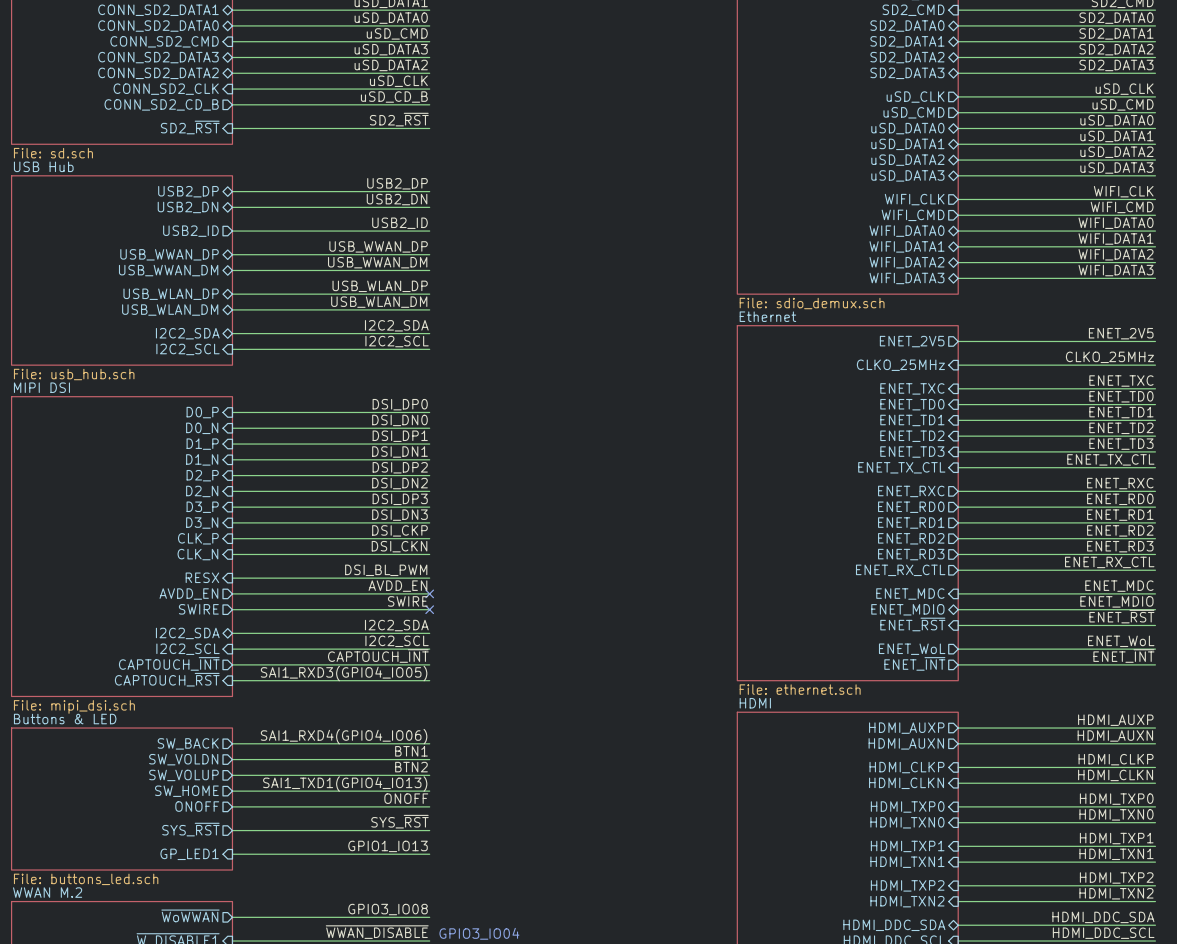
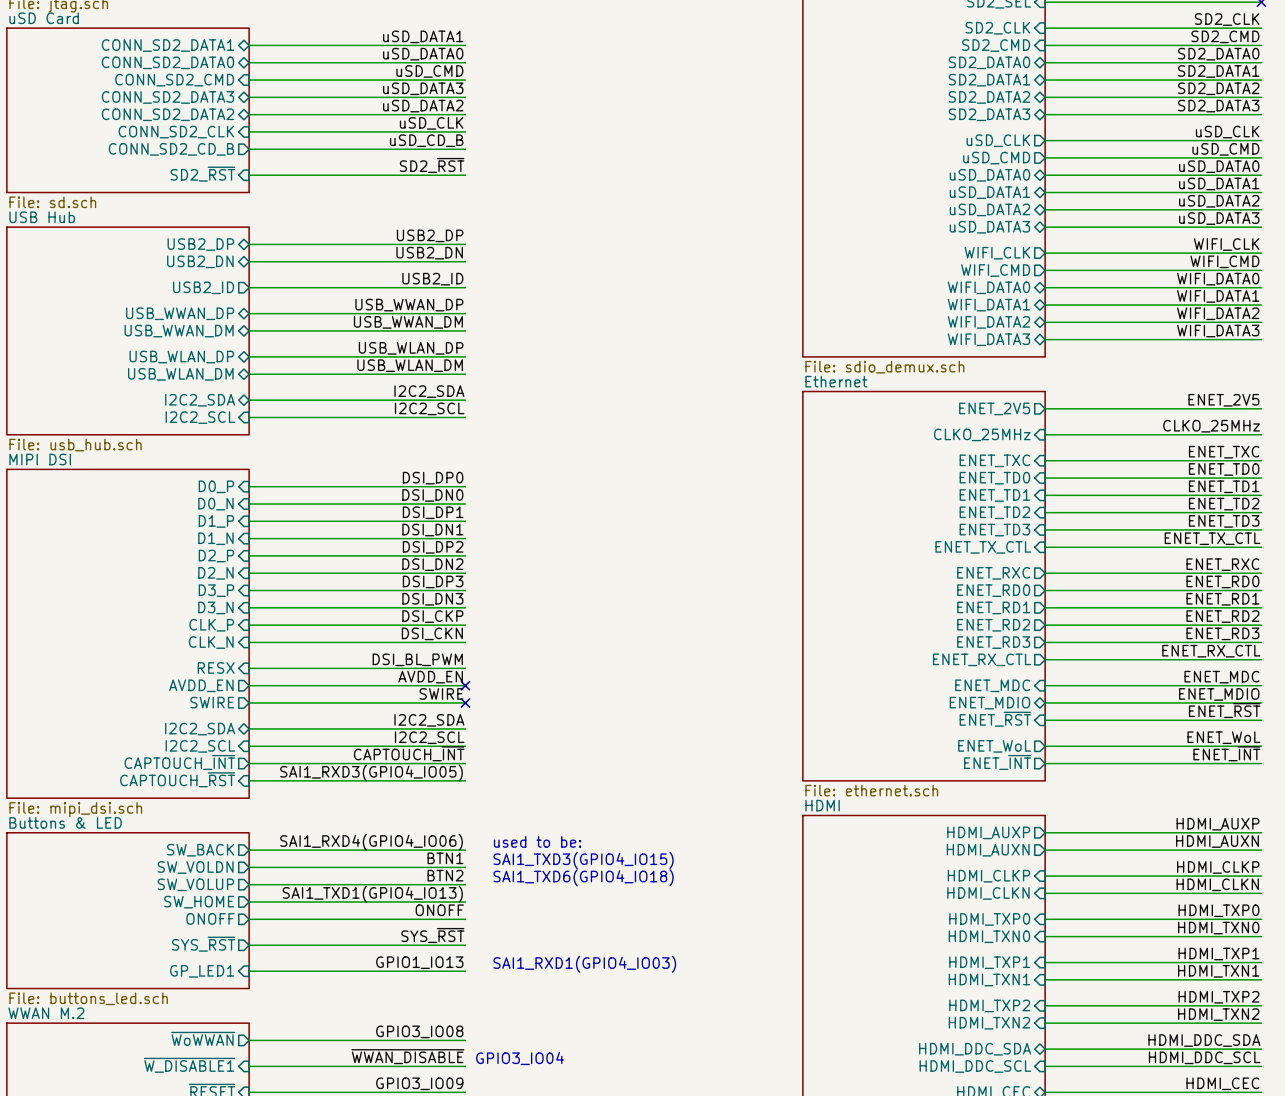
text: none -> used to be: (537, 841)
text: none -> SAI1_TXD3(GPIO4_IO15) (583, 860)
text: none -> SAI1_TXD6(GPIO4_IO18) (583, 877)
text: none -> SAI1_RXD1(GPIO4_IO03) (584, 964)

